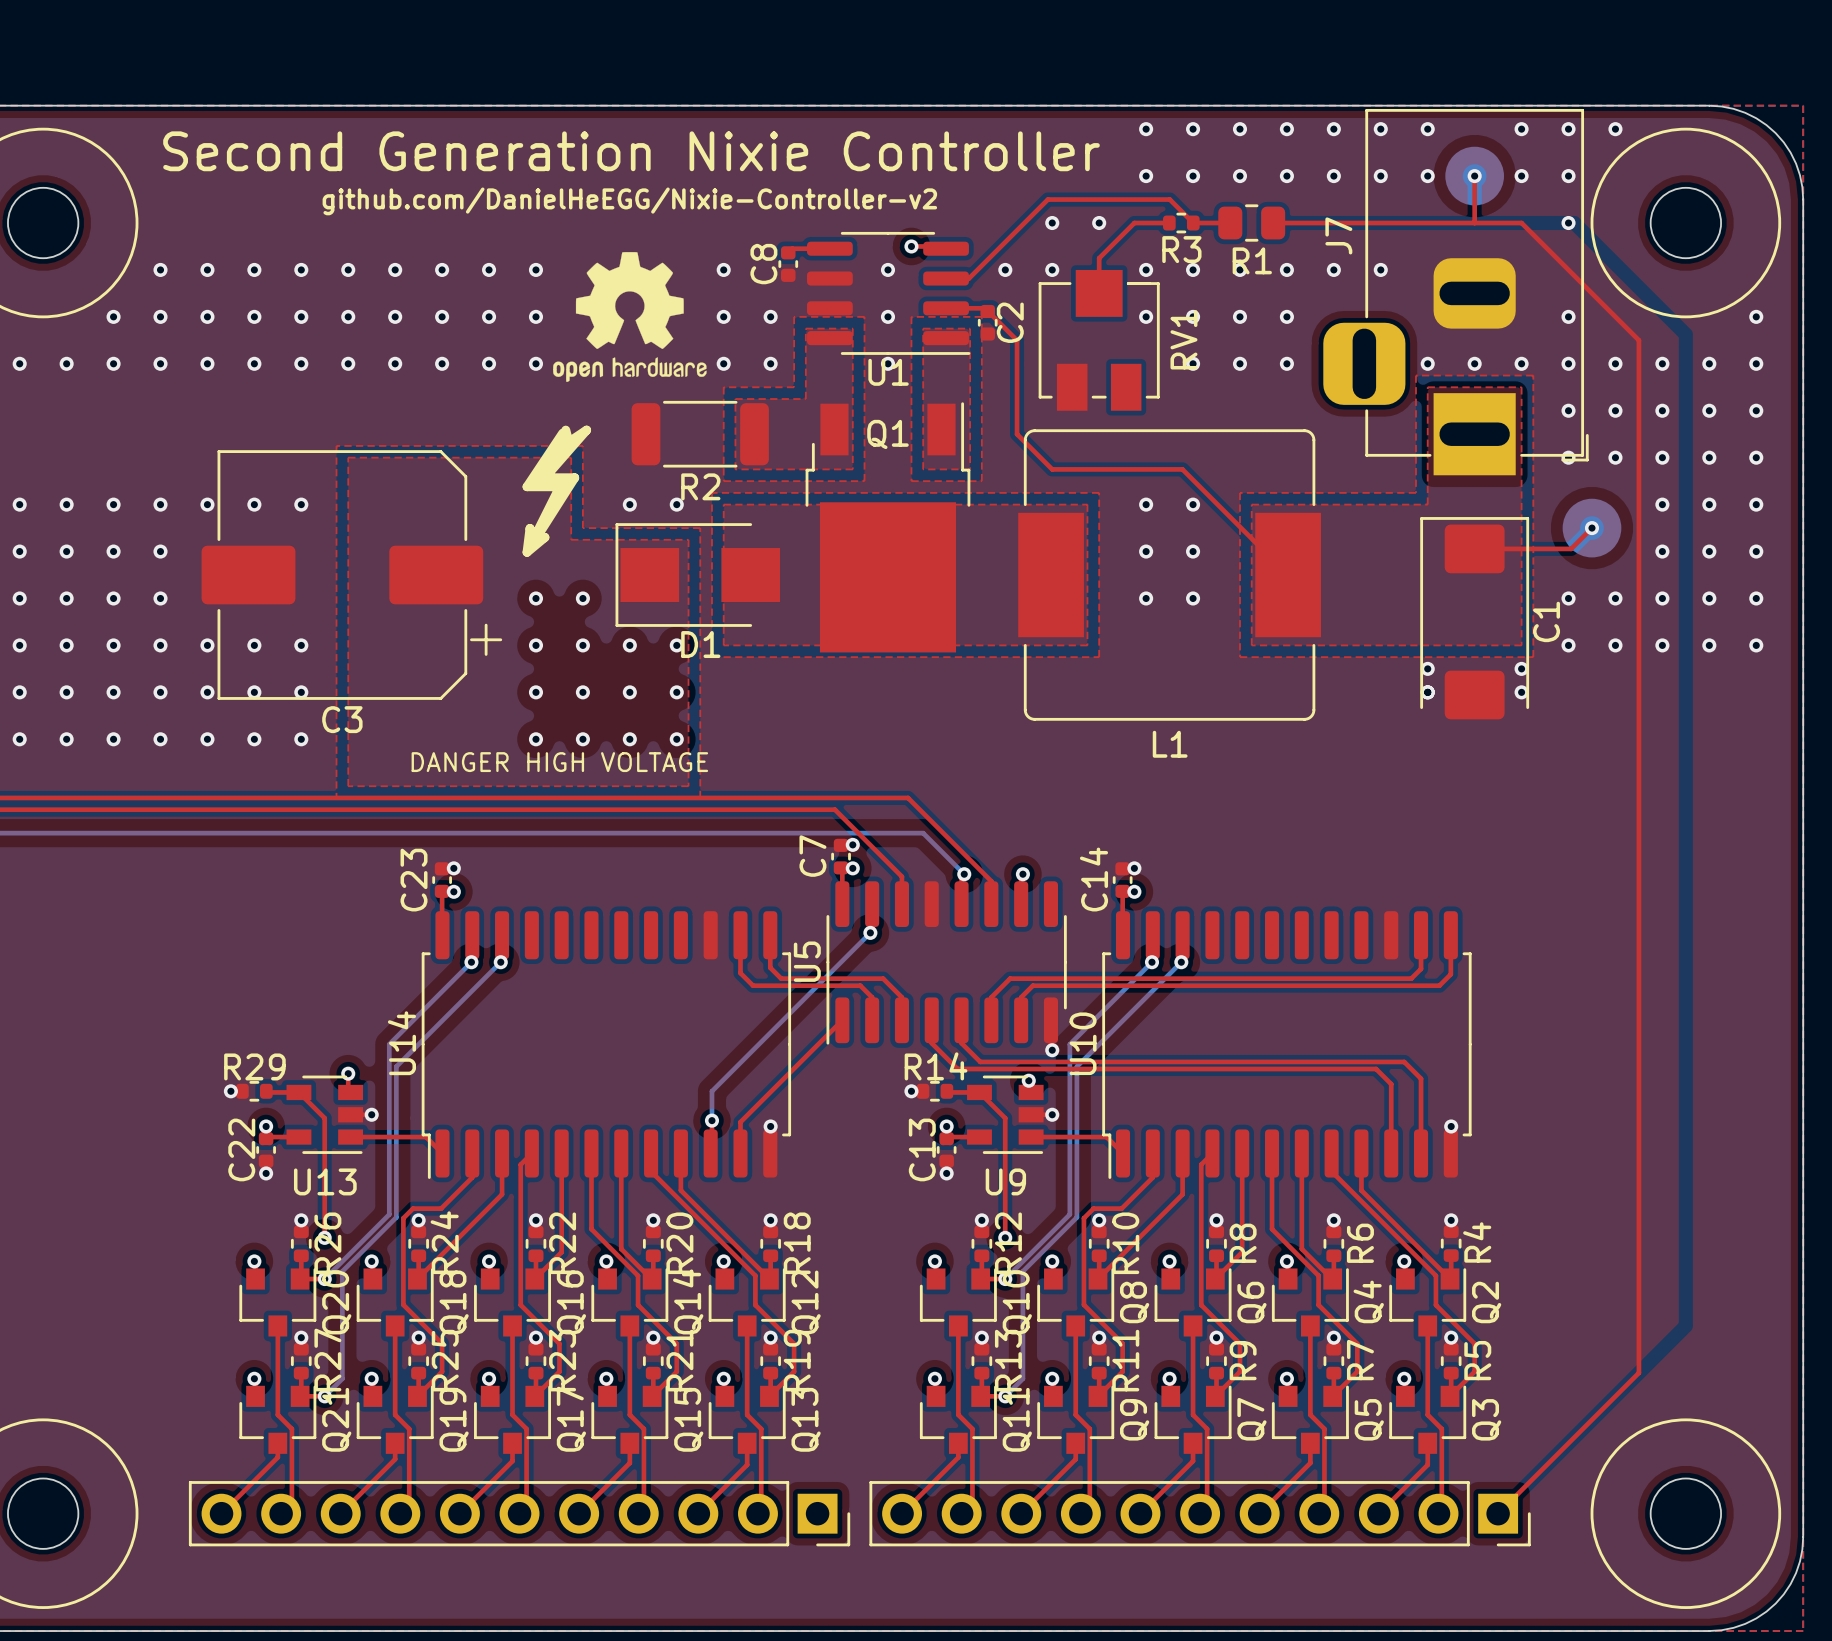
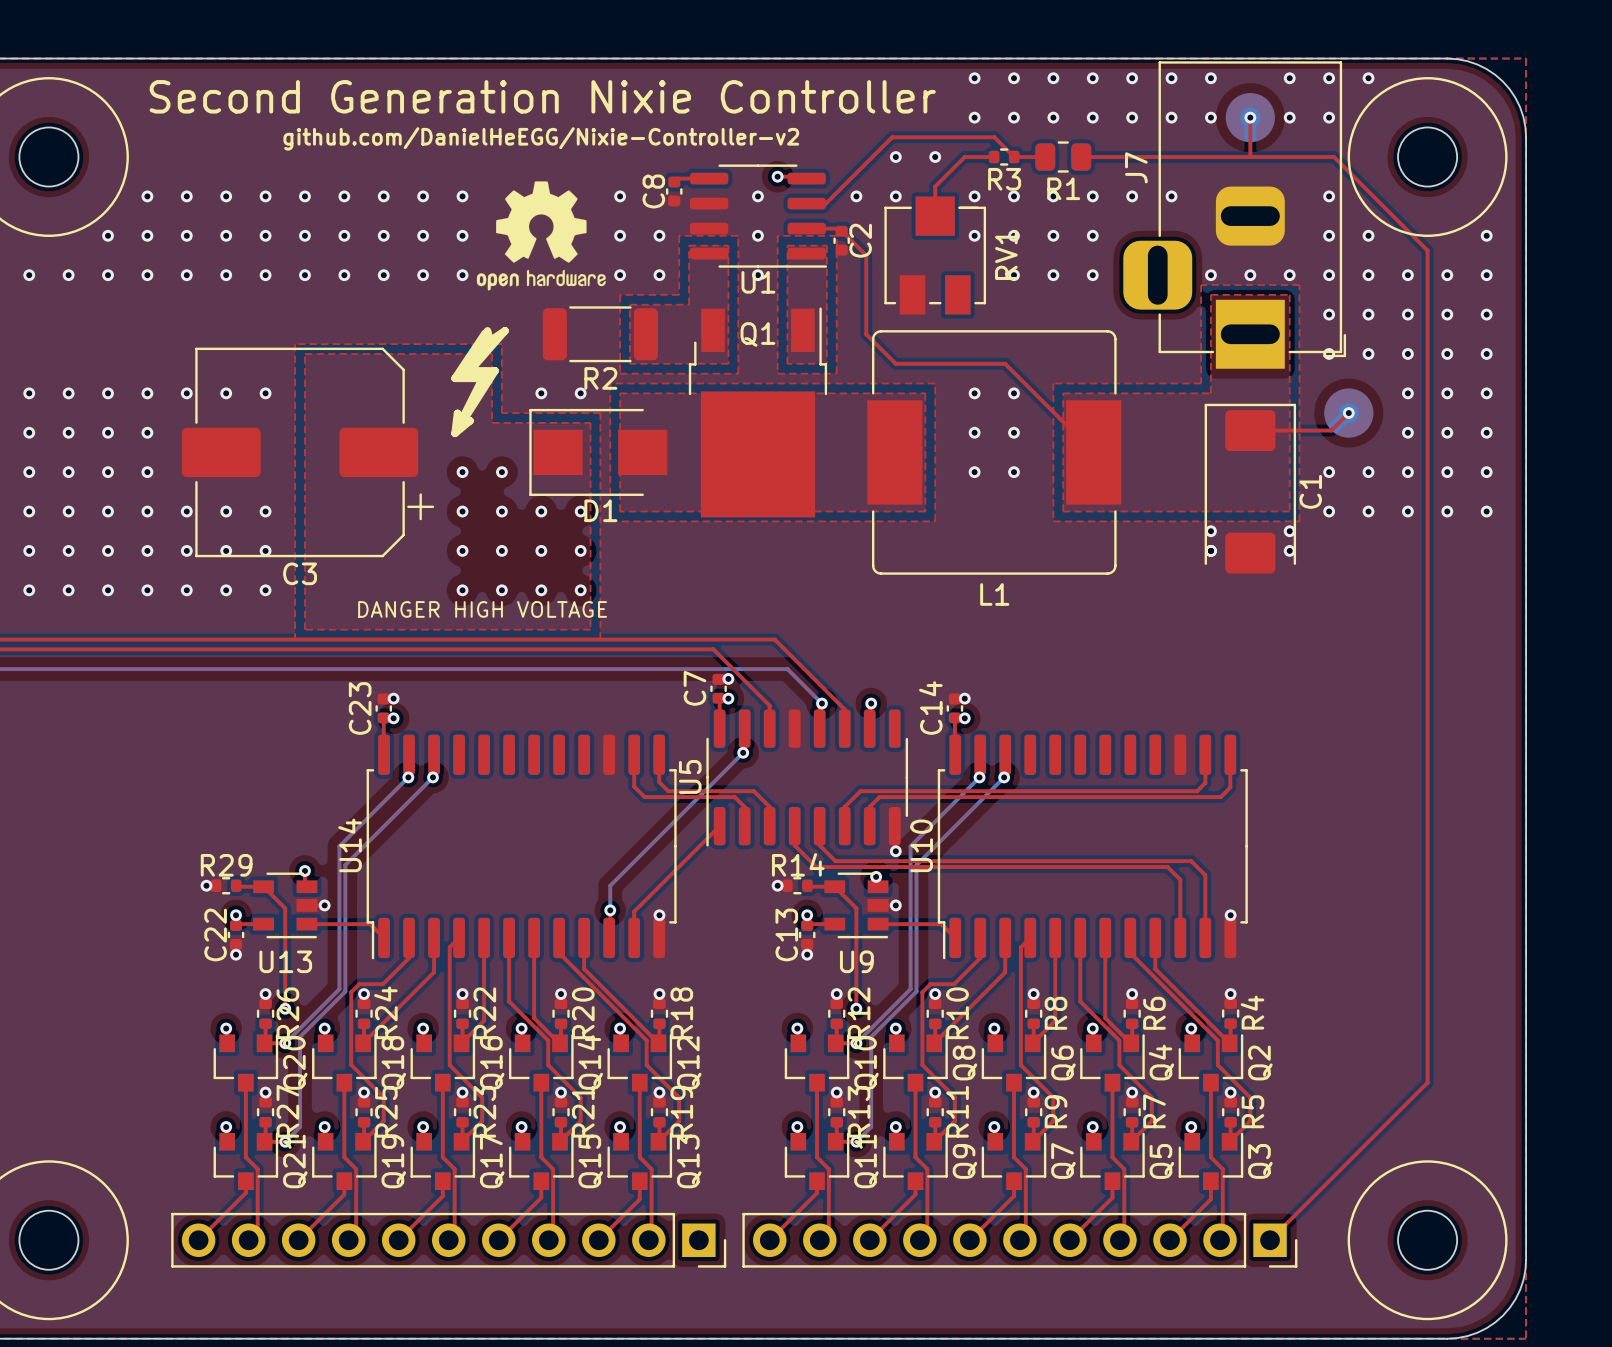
top track: (1521, 223) (1638, 340) (1638, 1372) -> (1289, 157) (1334, 157) (1427, 250) (1427, 1082) (1388, 1122)
via position: (1568, 223) -> (1329, 196)
via: none -> (1368, 235)

